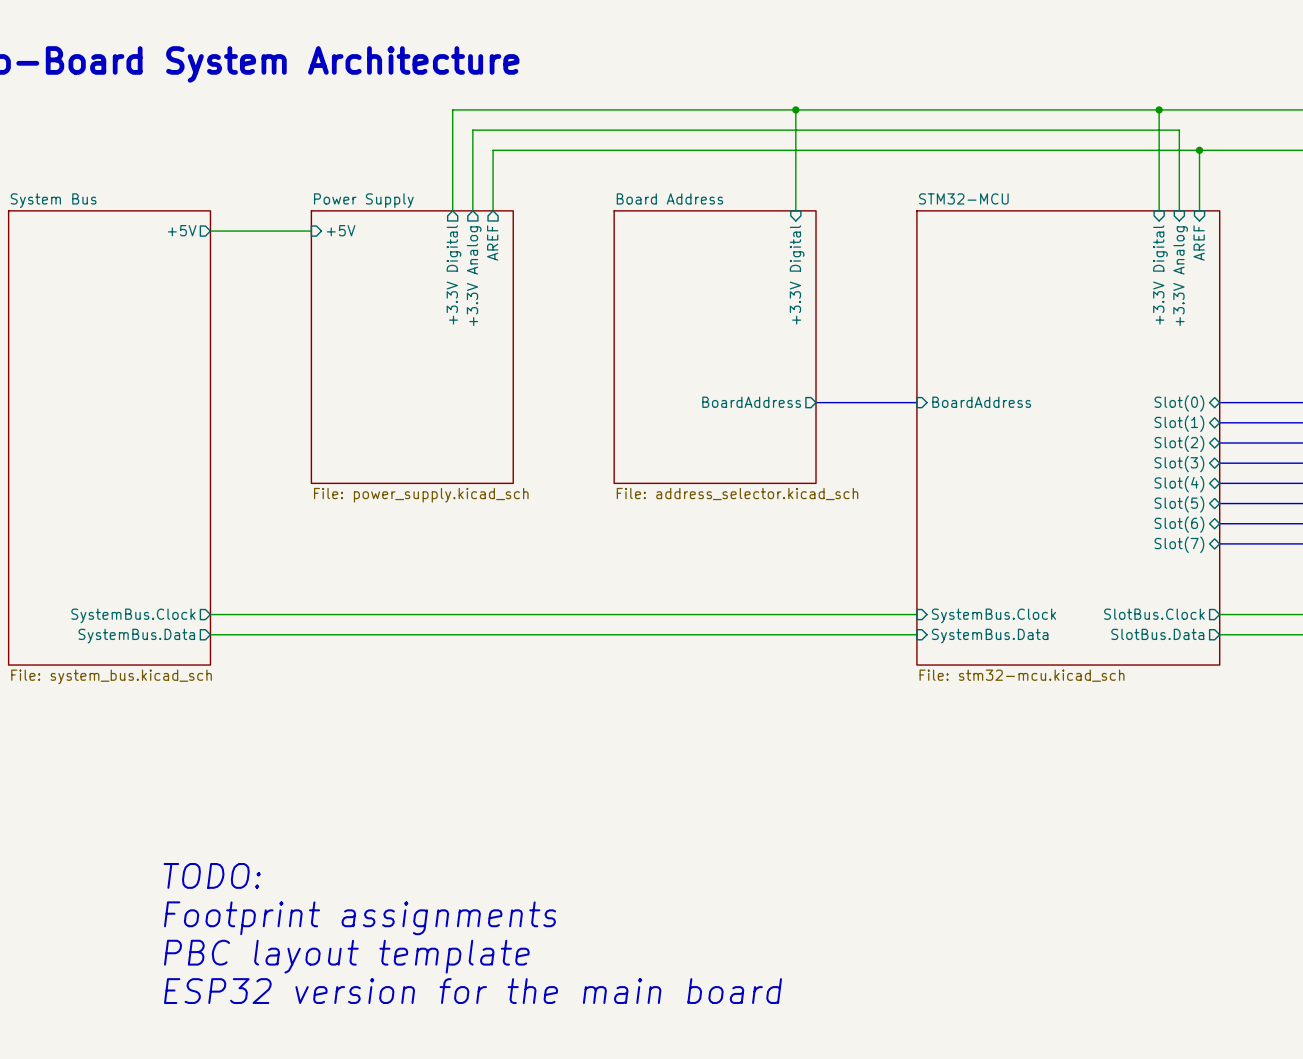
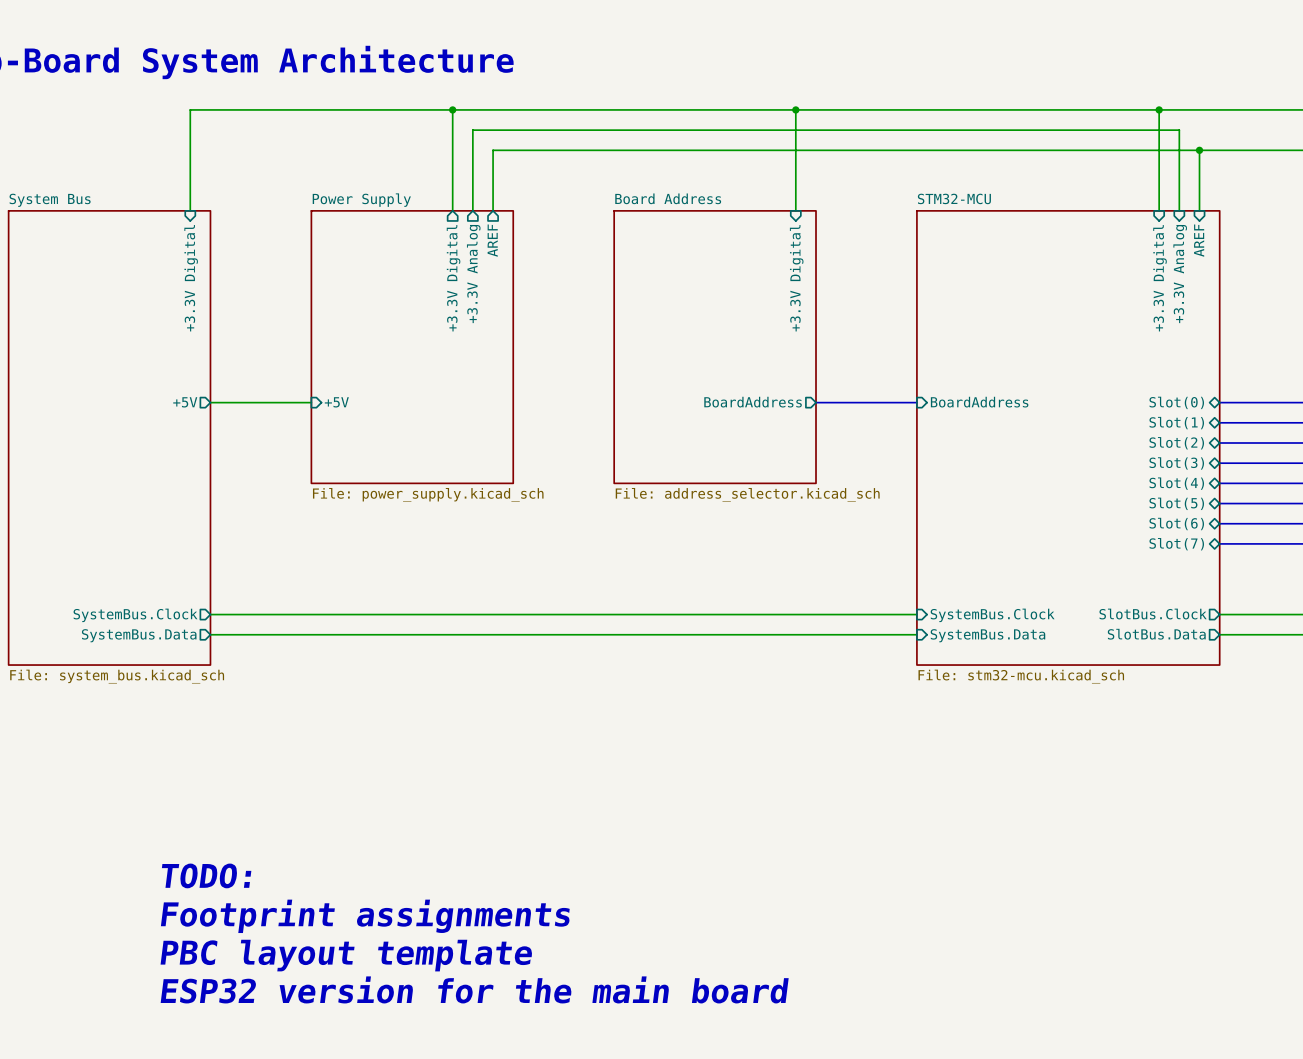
wire: none -> (452, 109) (190, 109) (190, 210)
junction: none -> (452, 109)
sheet pin: +5V (182, 230) -> none
sheet pin: +5V (341, 230) -> none
wire: (210, 231) (311, 231) -> (210, 402) (311, 402)
sheet pin: none -> +3.3V Digital (191, 278)
sheet pin: none -> +5V (185, 402)
sheet pin: none -> +5V (336, 402)

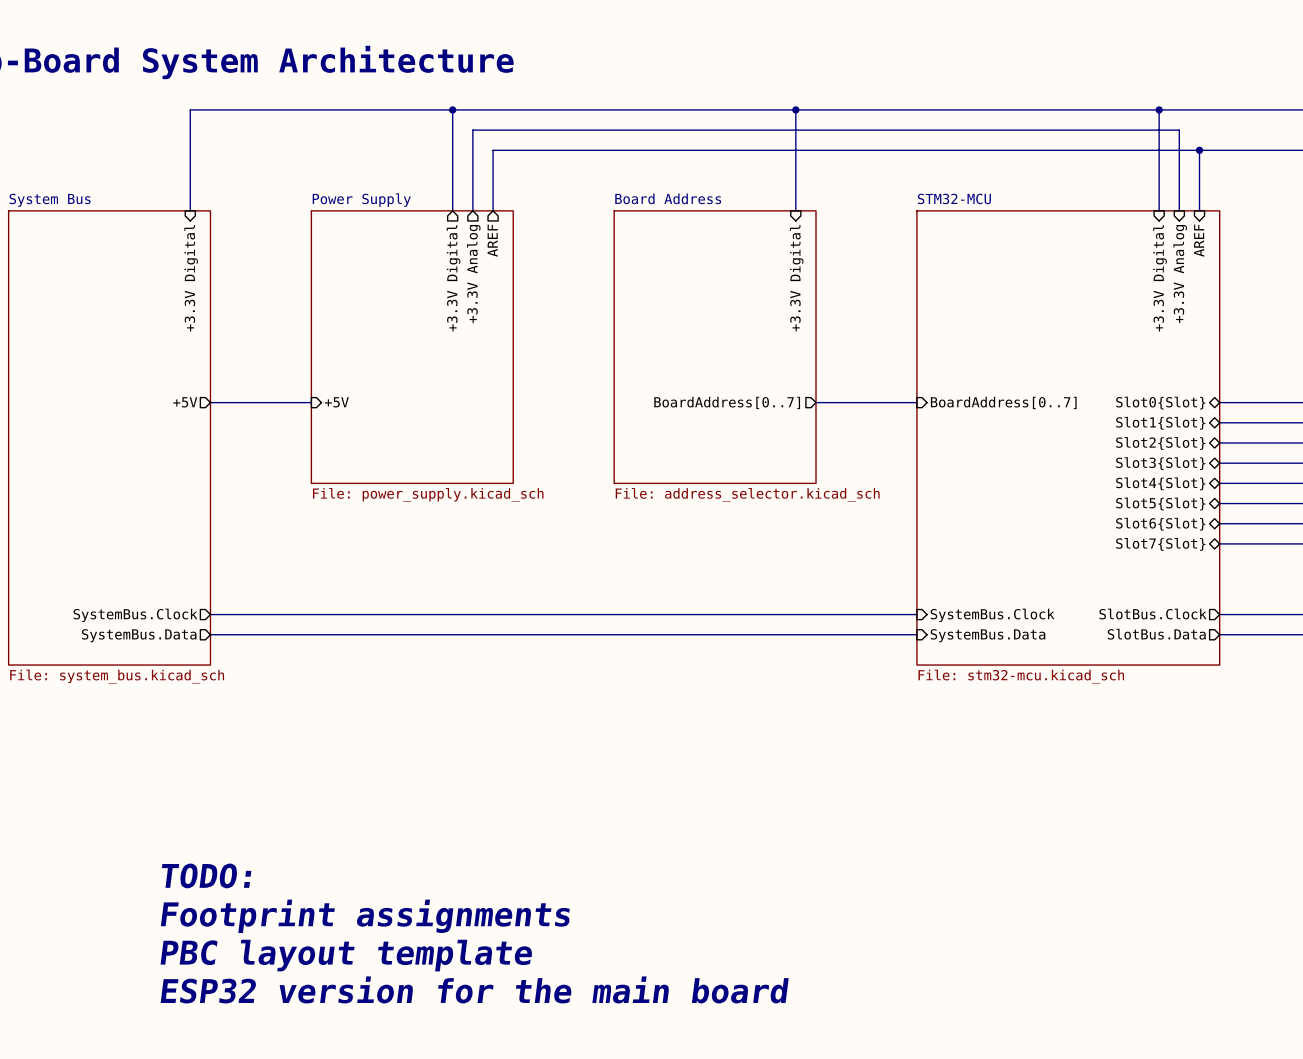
sheet pin: BoardAddress (753, 402) -> BoardAddress[0..7] (727, 402)
sheet pin: BoardAddress (979, 402) -> BoardAddress[0..7] (1003, 402)
sheet pin: Slot(0) (1176, 402) -> Slot0{Slot} (1160, 403)
sheet pin: Slot(1) (1176, 423) -> Slot1{Slot} (1160, 423)
sheet pin: Slot(2) (1176, 443) -> Slot2{Slot} (1160, 443)
sheet pin: Slot(3) (1176, 463) -> Slot3{Slot} (1160, 463)
sheet pin: Slot(4) (1176, 483) -> Slot4{Slot} (1160, 483)
sheet pin: Slot(5) (1176, 503) -> Slot5{Slot} (1160, 504)
sheet pin: Slot(6) (1176, 524) -> Slot6{Slot} (1160, 524)
sheet pin: Slot(7) (1176, 544) -> Slot7{Slot} (1160, 544)

